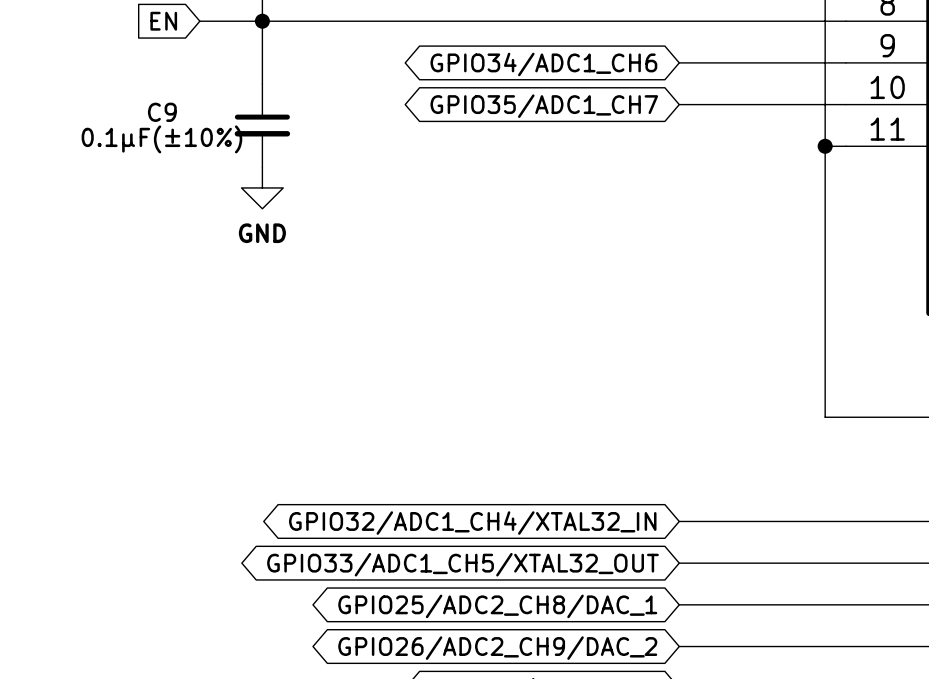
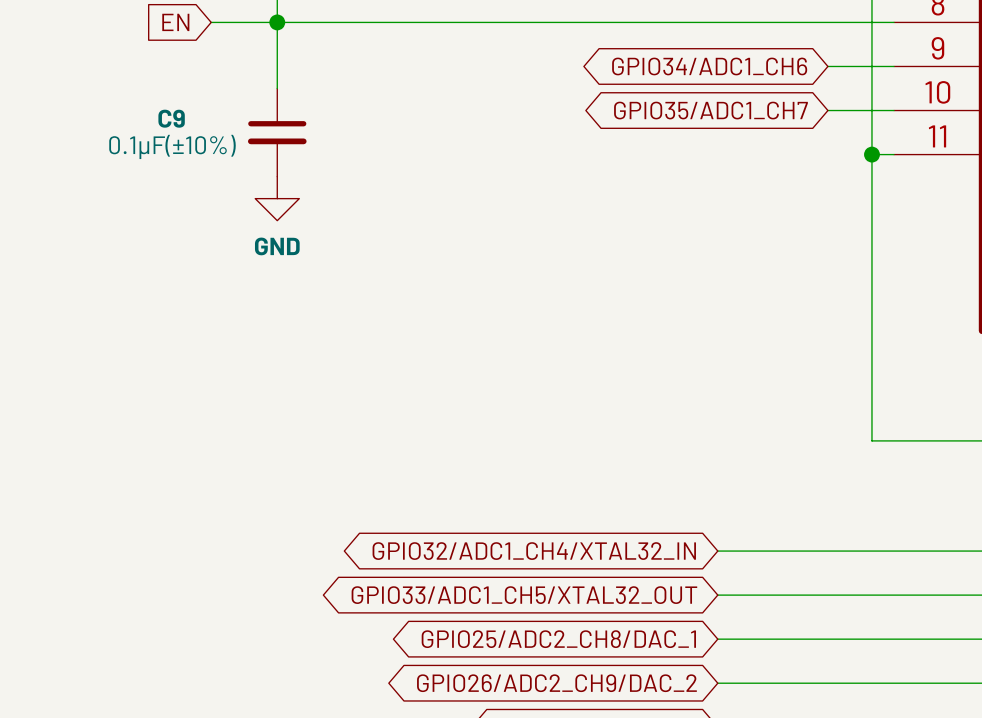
wire: (679, 62) (783, 62) -> none
global label position: GPIO34/ADC1_CH6 (543, 64) -> GPIO34/ADC1_CH6 (709, 66)
wire: (679, 104) (783, 104) -> none
global label position: GPIO35/ADC1_CH7 (544, 106) -> GPIO35/ADC1_CH7 (710, 110)

